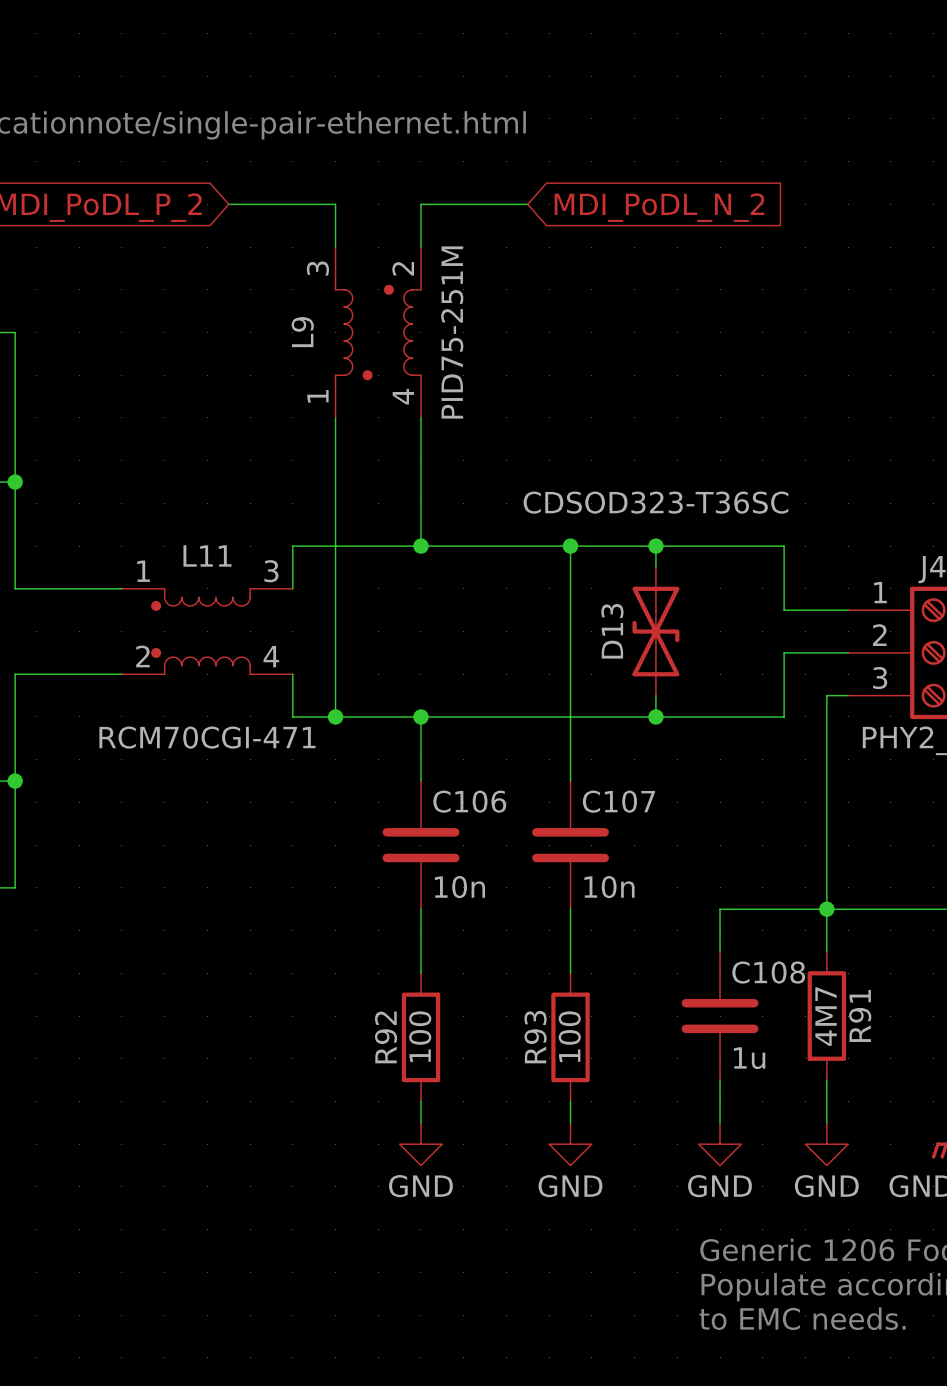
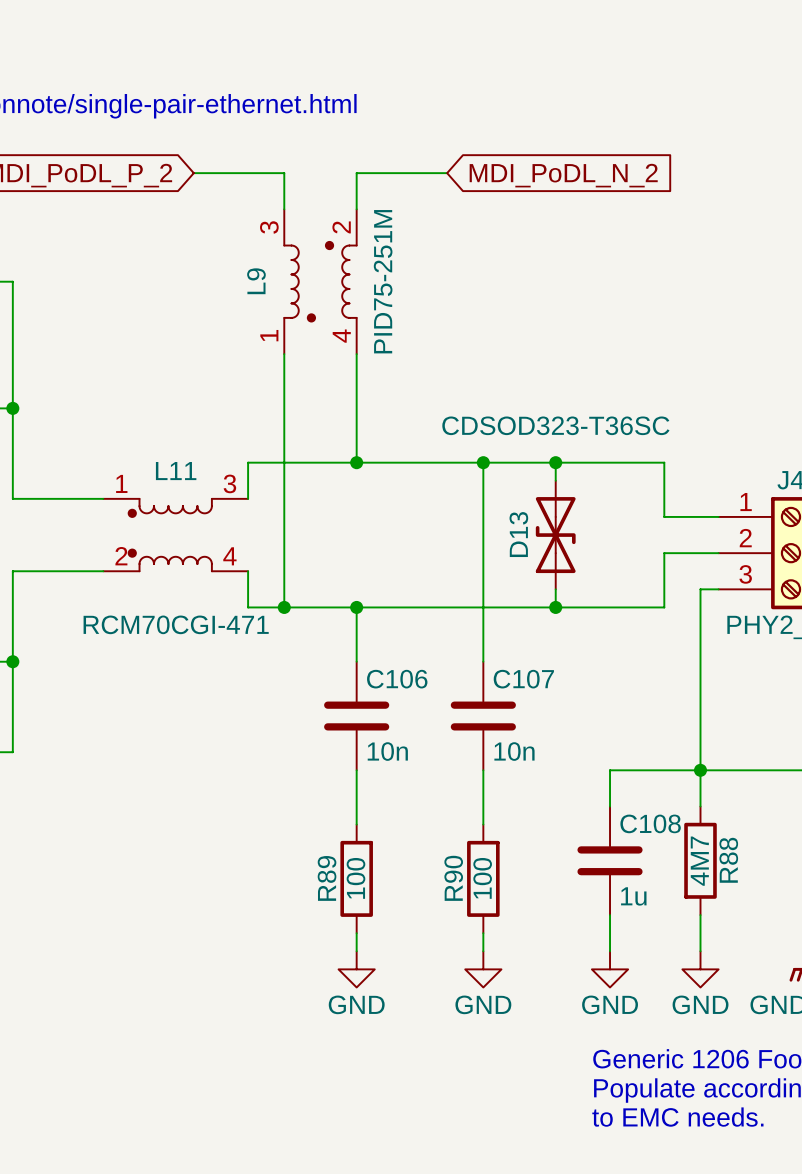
R91 name: R91 (860, 1015) -> R88 (728, 860)
R92 name: R92 (386, 1037) -> R89 (327, 878)
R93 name: R93 (535, 1037) -> R90 (453, 878)

